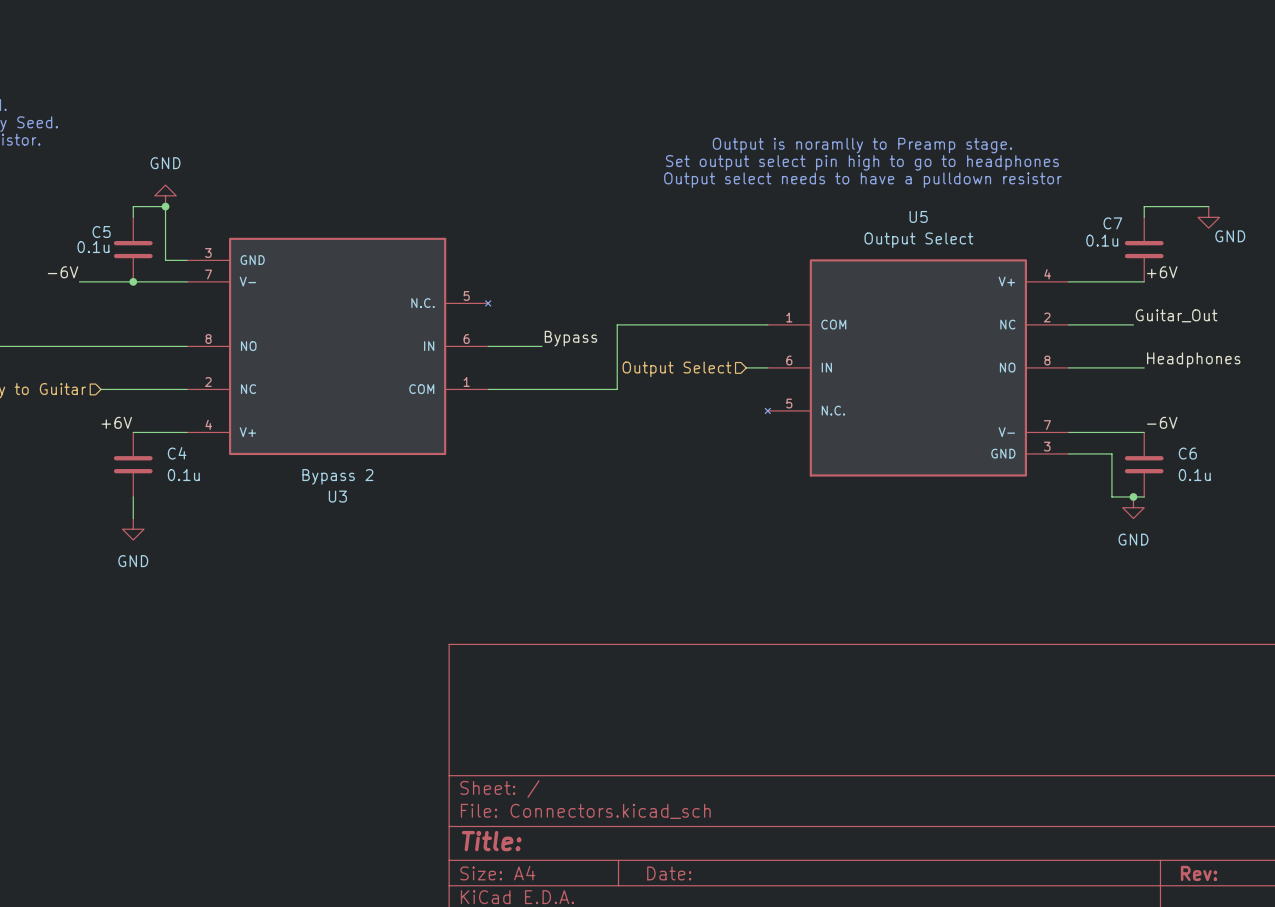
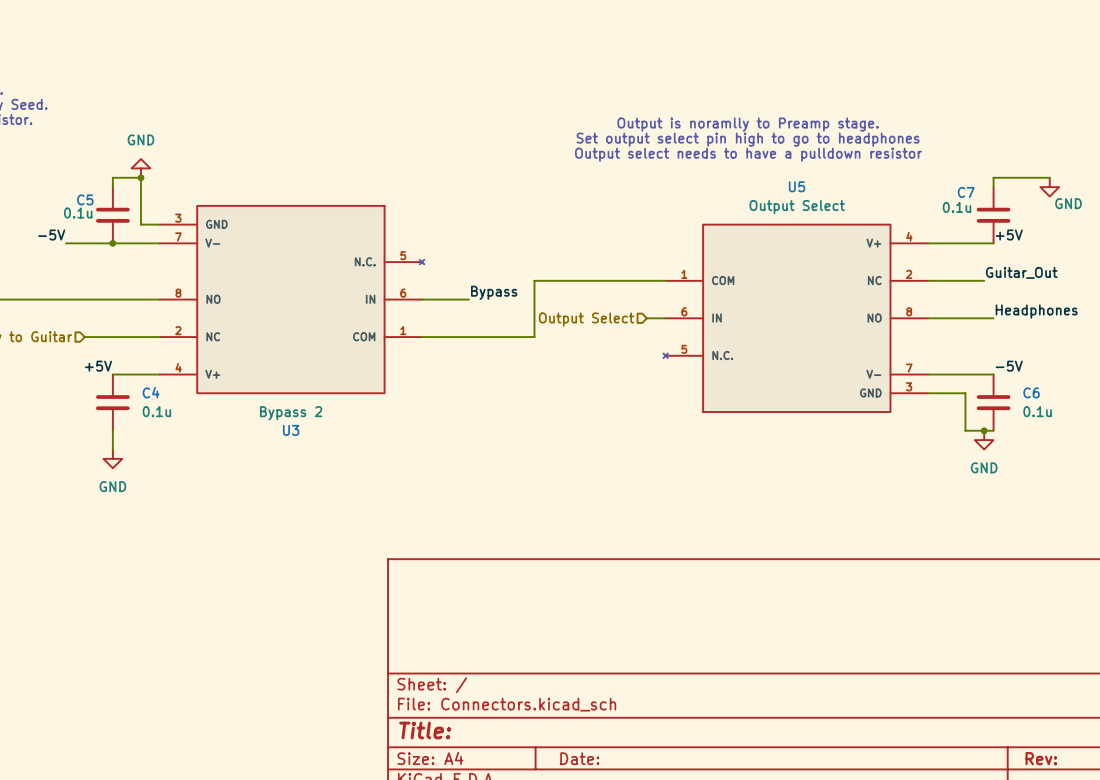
label: -6V (63, 272) -> -5V (51, 235)
label: +6V (1162, 272) -> +5V (1009, 235)
label: +6V (116, 422) -> +5V (98, 366)
label: -6V (1162, 422) -> -5V (1009, 366)

